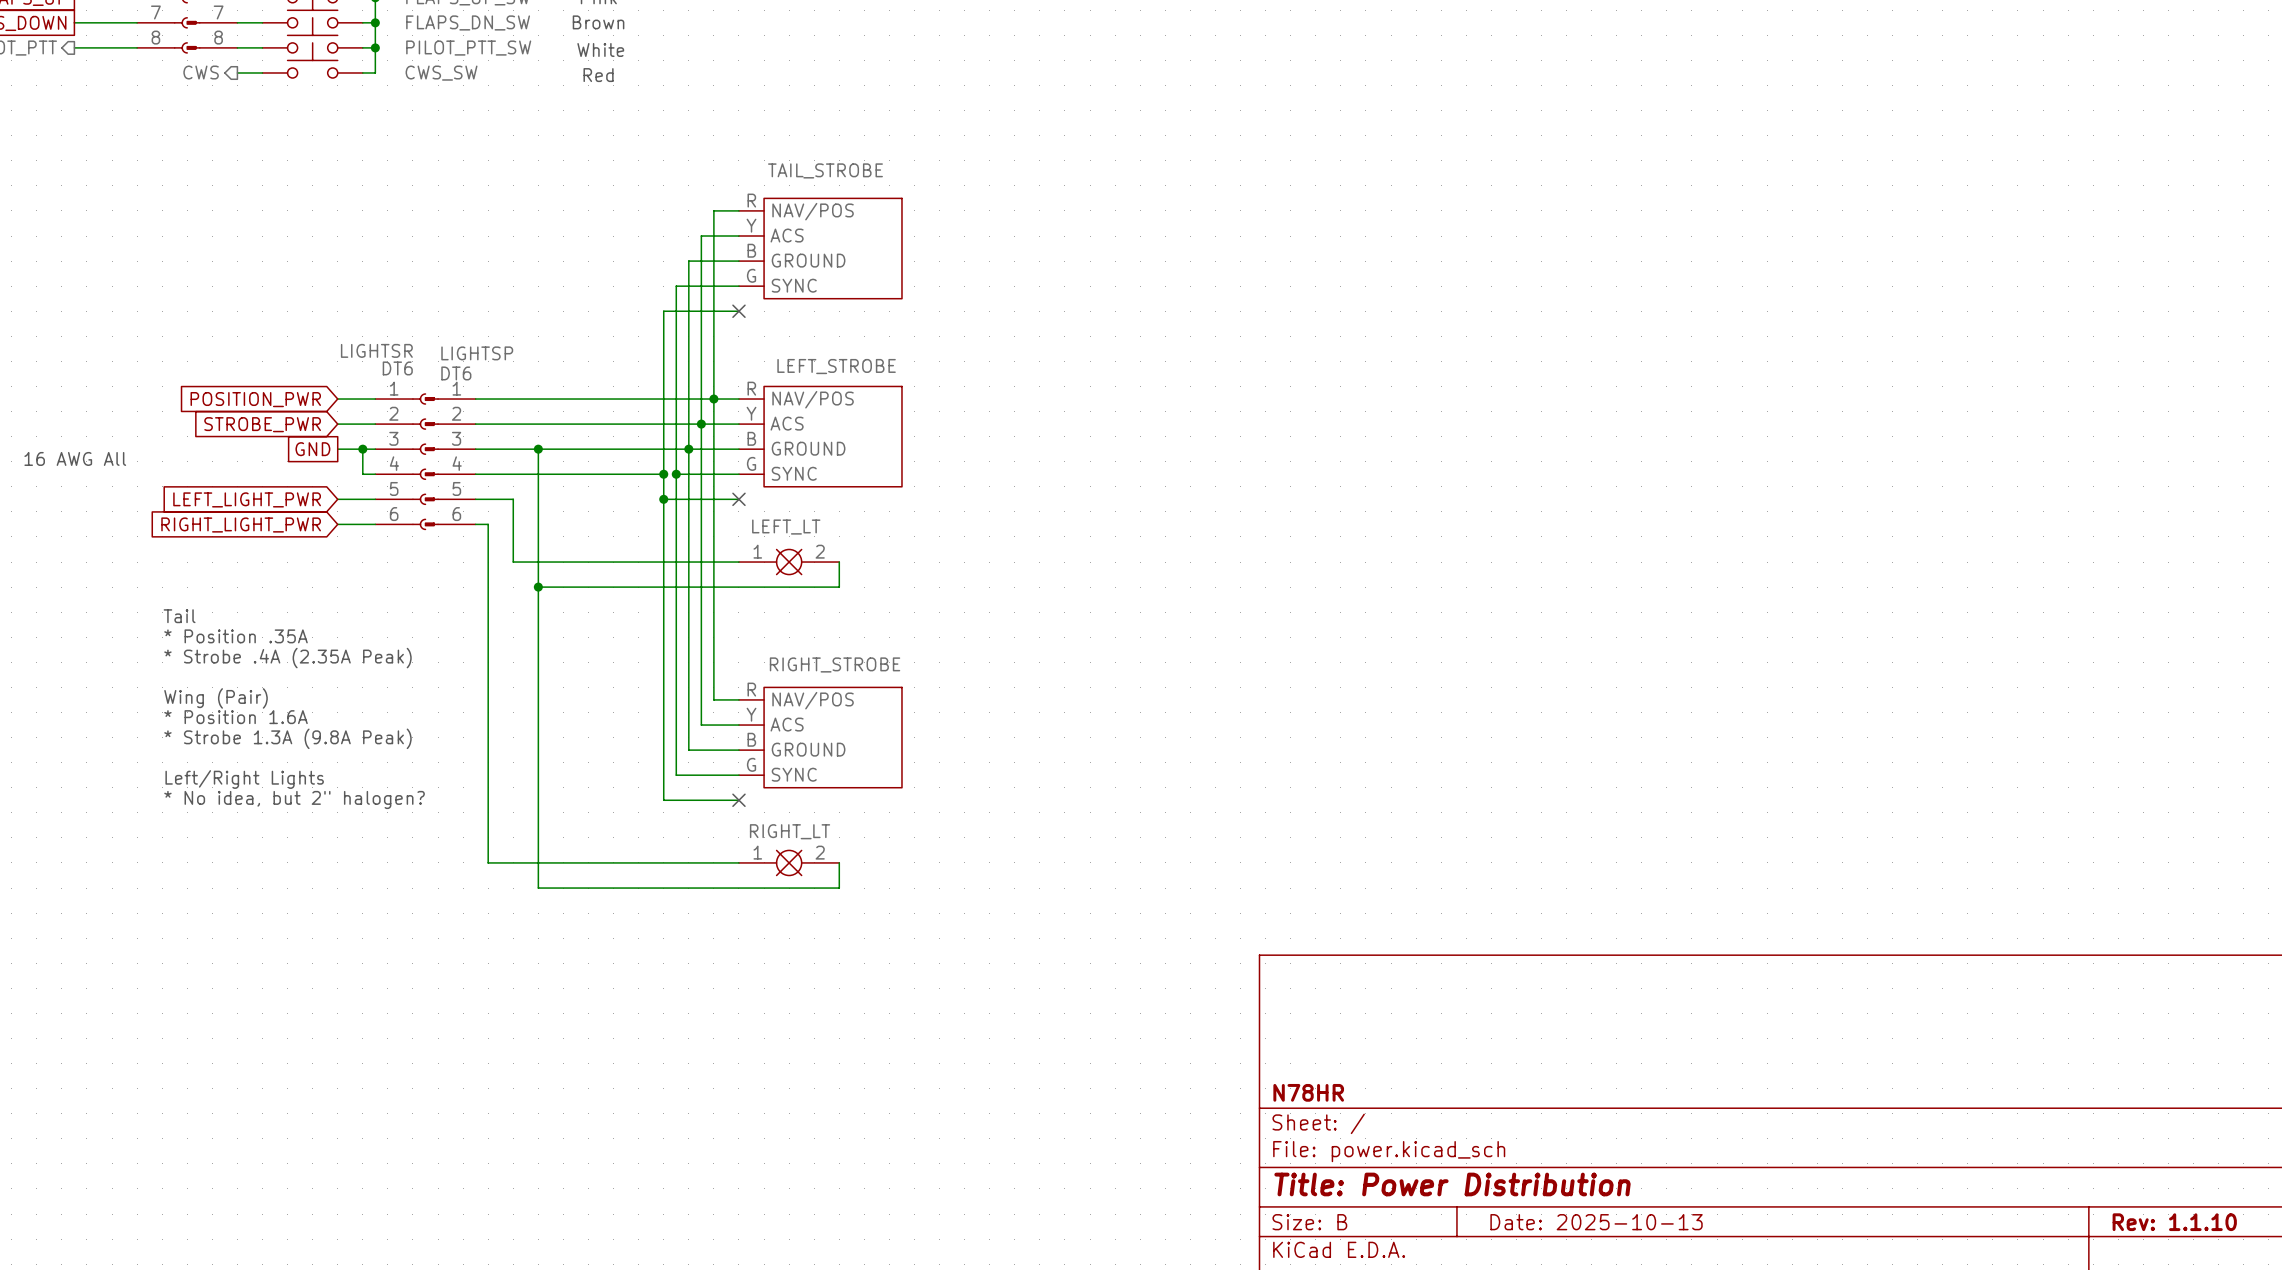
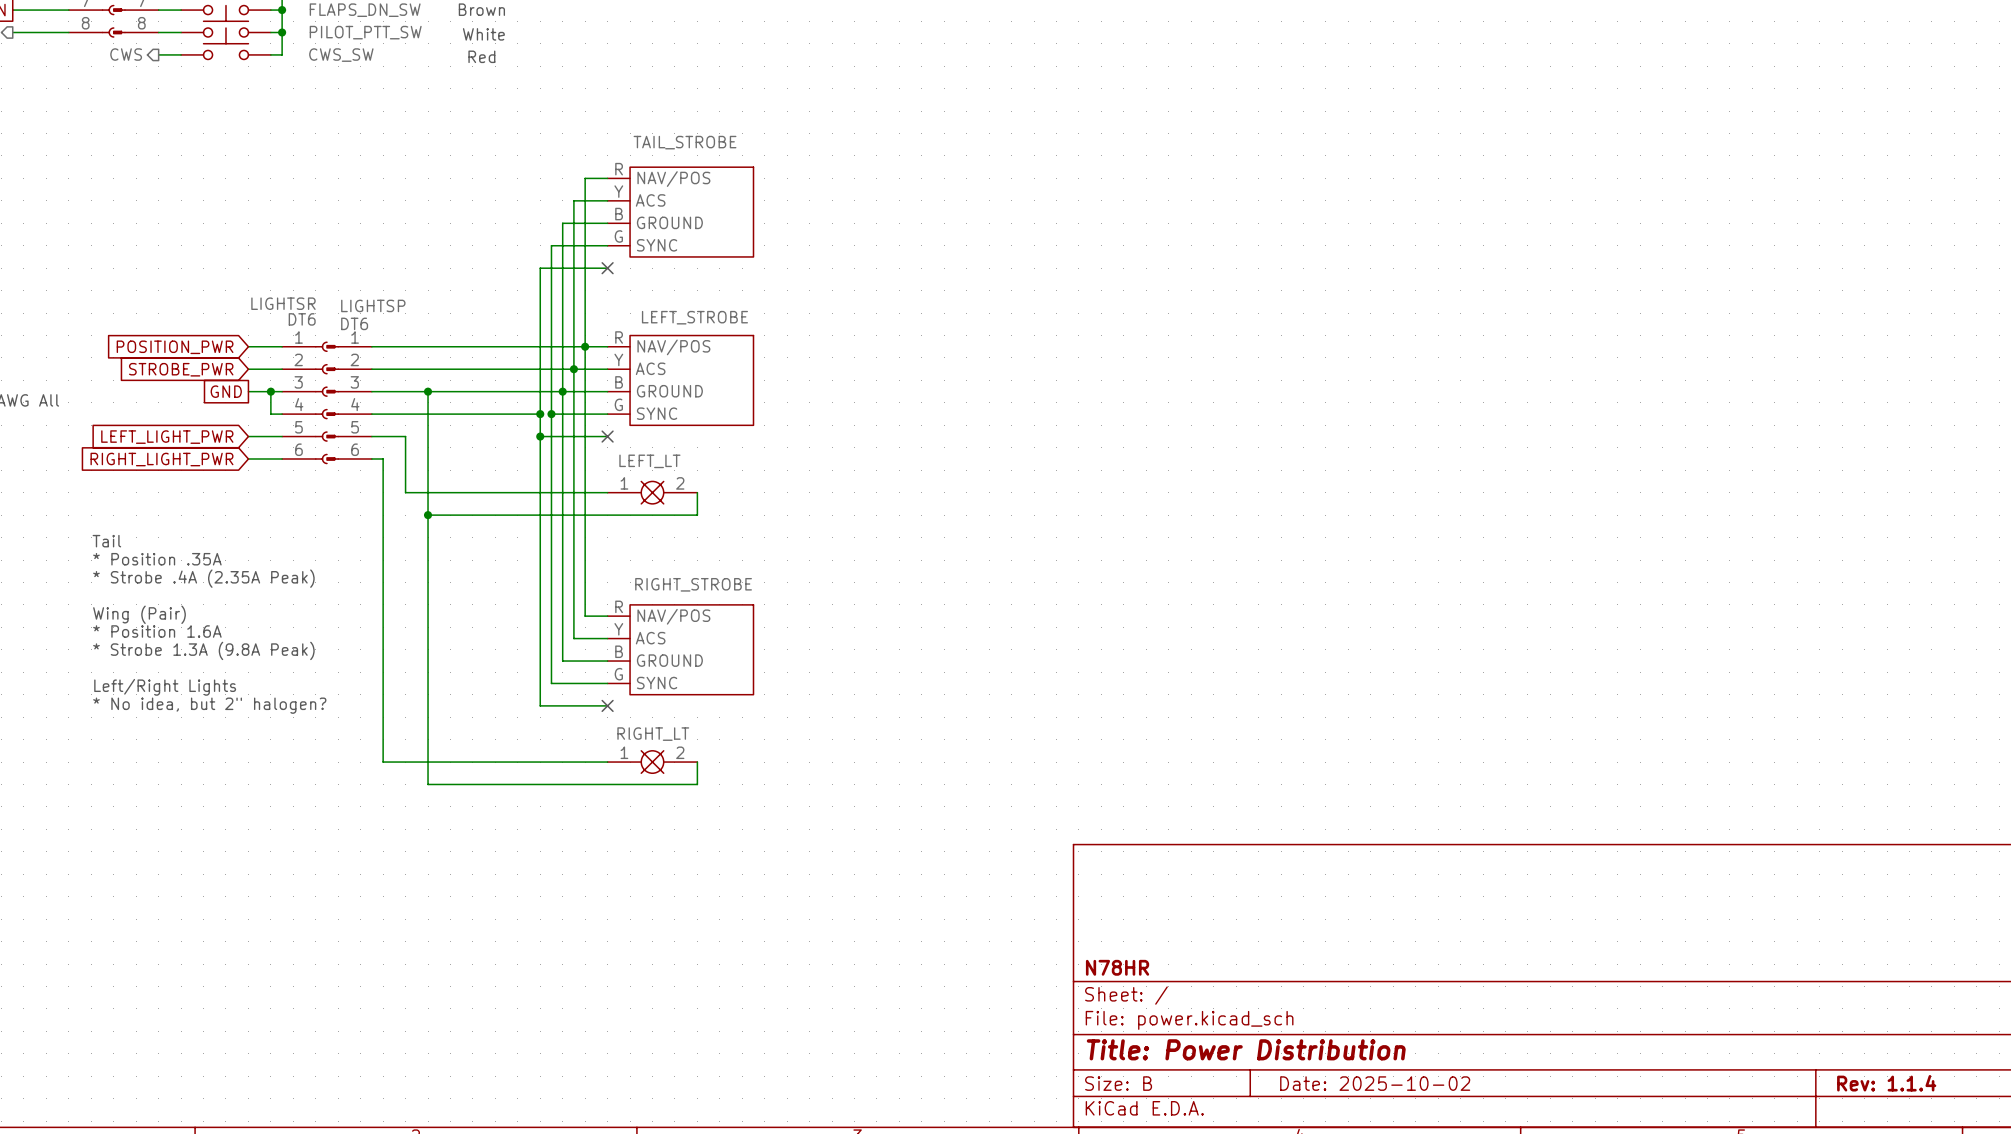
title block: Date: 2025-10-13 (1596, 1222) -> Date: 2025-10-02 (1375, 1083)
title block: Rev: 1.1.10 (2174, 1222) -> Rev: 1.1.4 (1886, 1083)

